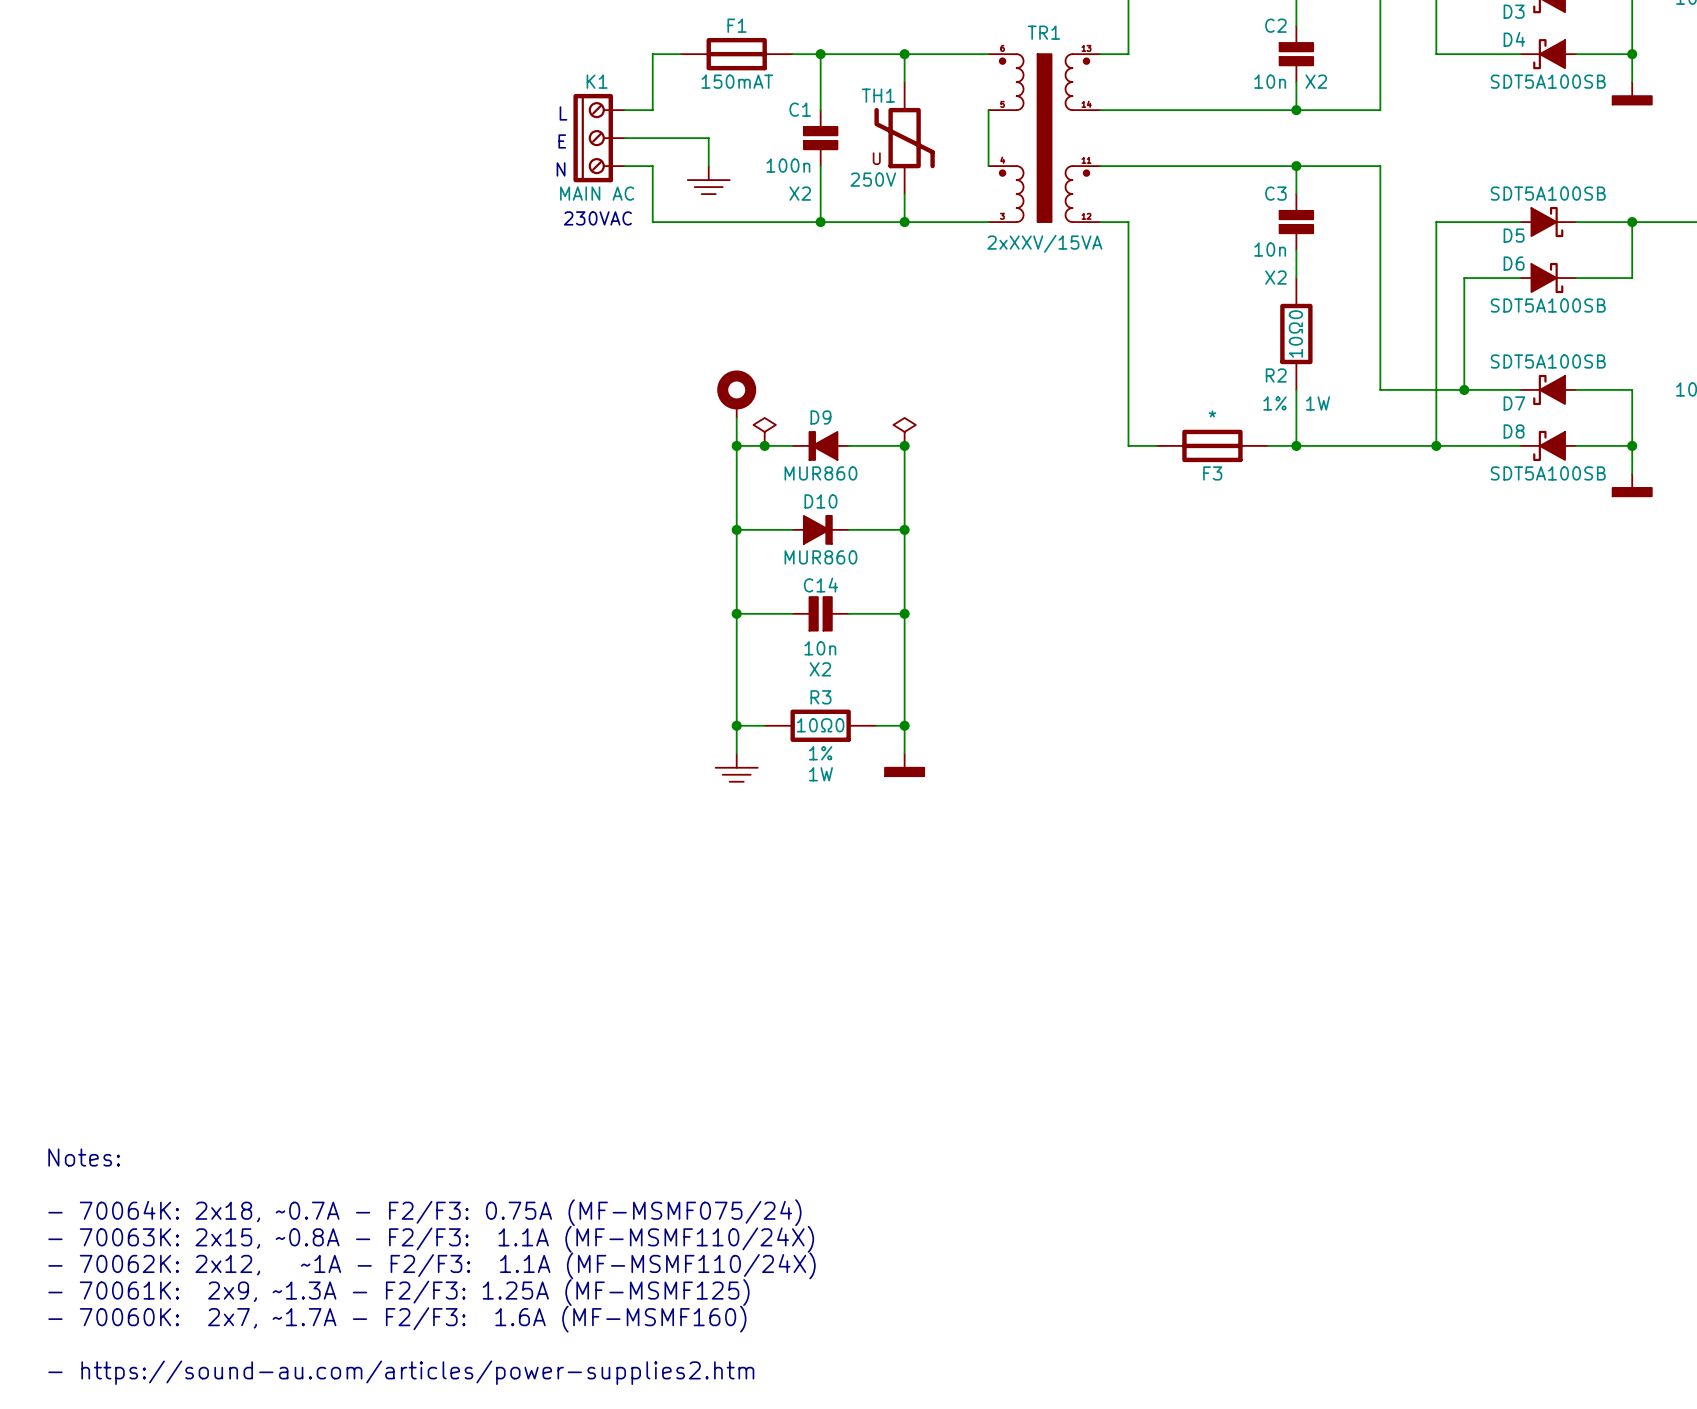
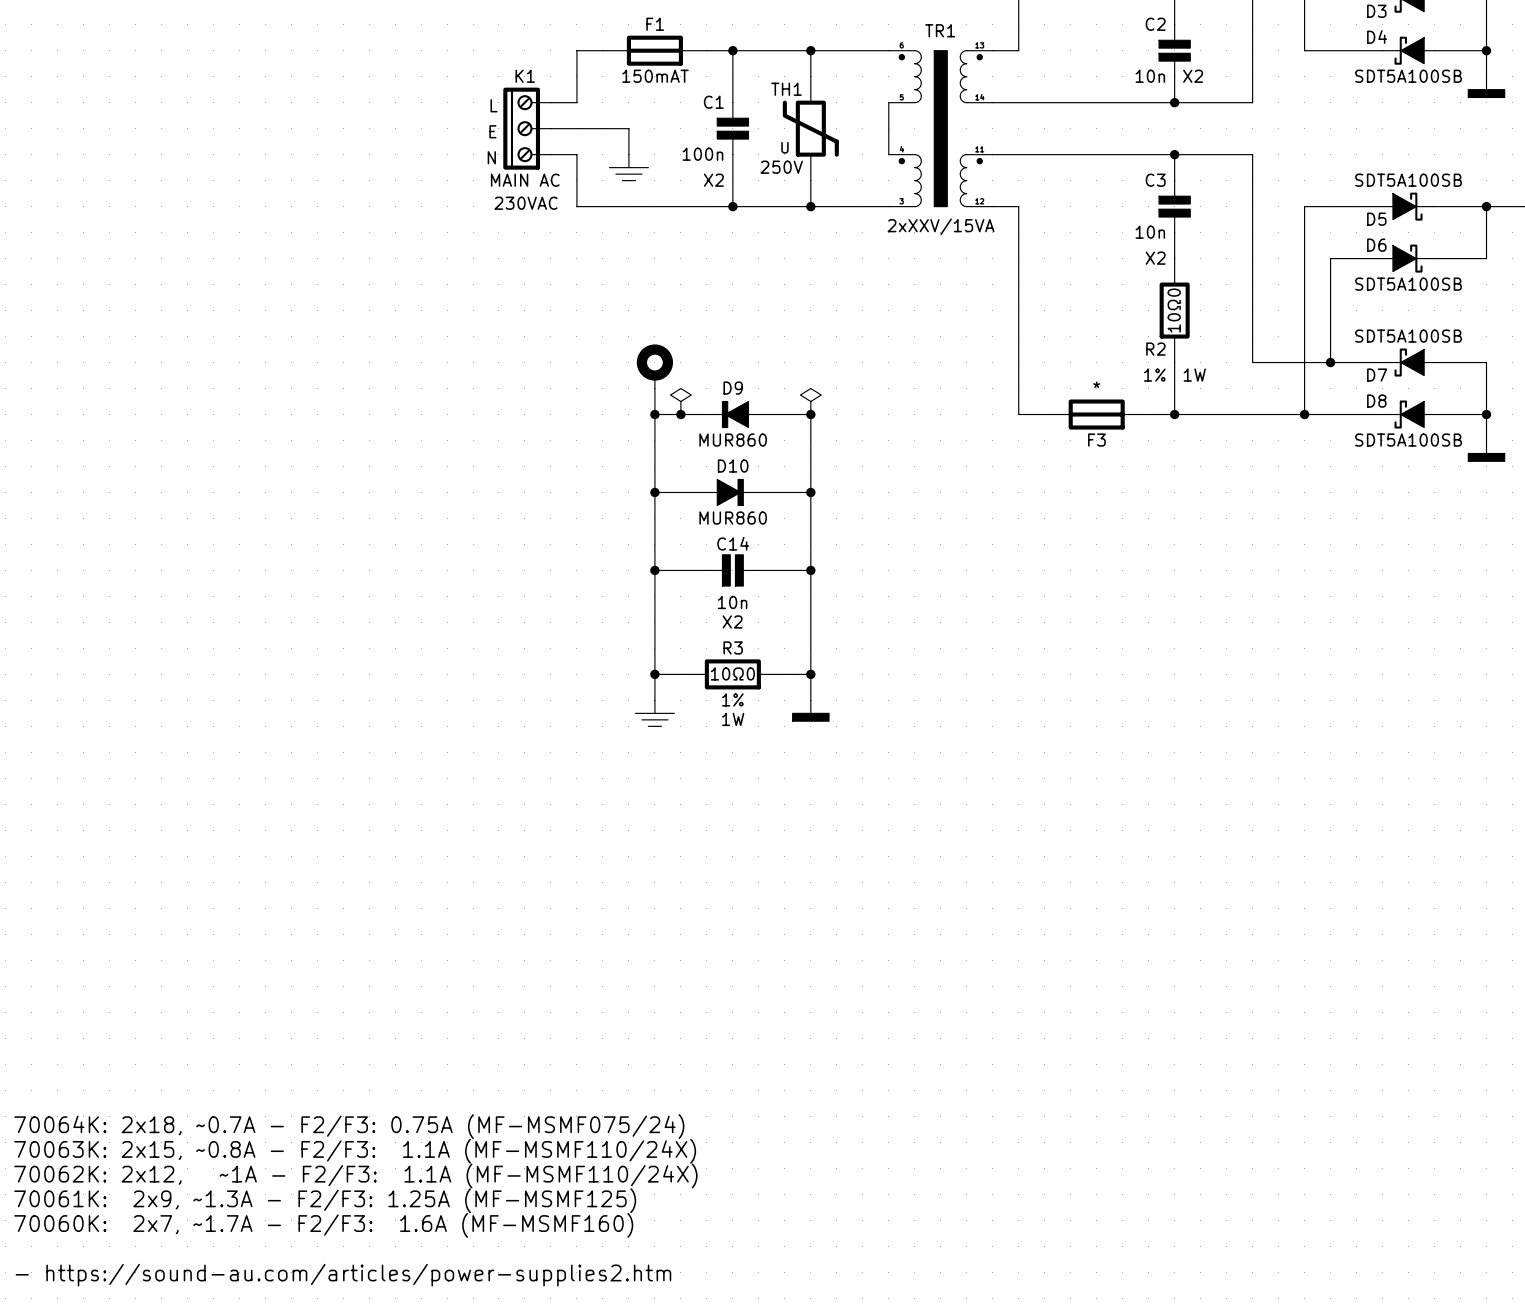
text: Notes: (84, 1157) -> none
text: - 70064K: 2x18, ~0.7A - F2/F3: 0.75A (MF-MSMF075/24) (424, 1212) -> 70064K: 2x18, ~0.7A - F2/F3: 0.75A (MF-MSMF075/24) (349, 1126)
text: - 70063K: 2x15, ~0.8A - F2/F3: 1.1A (MF-MSMF110/24X) (431, 1239) -> 70063K: 2x15, ~0.8A - F2/F3: 1.1A (MF-MSMF110/24X) (355, 1151)
text: - 70062K: 2x12, ~1A - F2/F3: 1.1A (MF-MSMF110/24X) (431, 1265) -> 70062K: 2x12, ~1A - F2/F3: 1.1A (MF-MSMF110/24X) (355, 1175)
text: - 70061K: 2x9, ~1.3A - F2/F3: 1.25A (MF-MSMF125) (398, 1292) -> 70061K: 2x9, ~1.3A - F2/F3: 1.25A (MF-MSMF125) (325, 1200)
text: - 70060K: 2x7, ~1.7A - F2/F3: 1.6A (MF-MSMF160) (397, 1319) -> 70060K: 2x7, ~1.7A - F2/F3: 1.6A (MF-MSMF160) (323, 1225)

